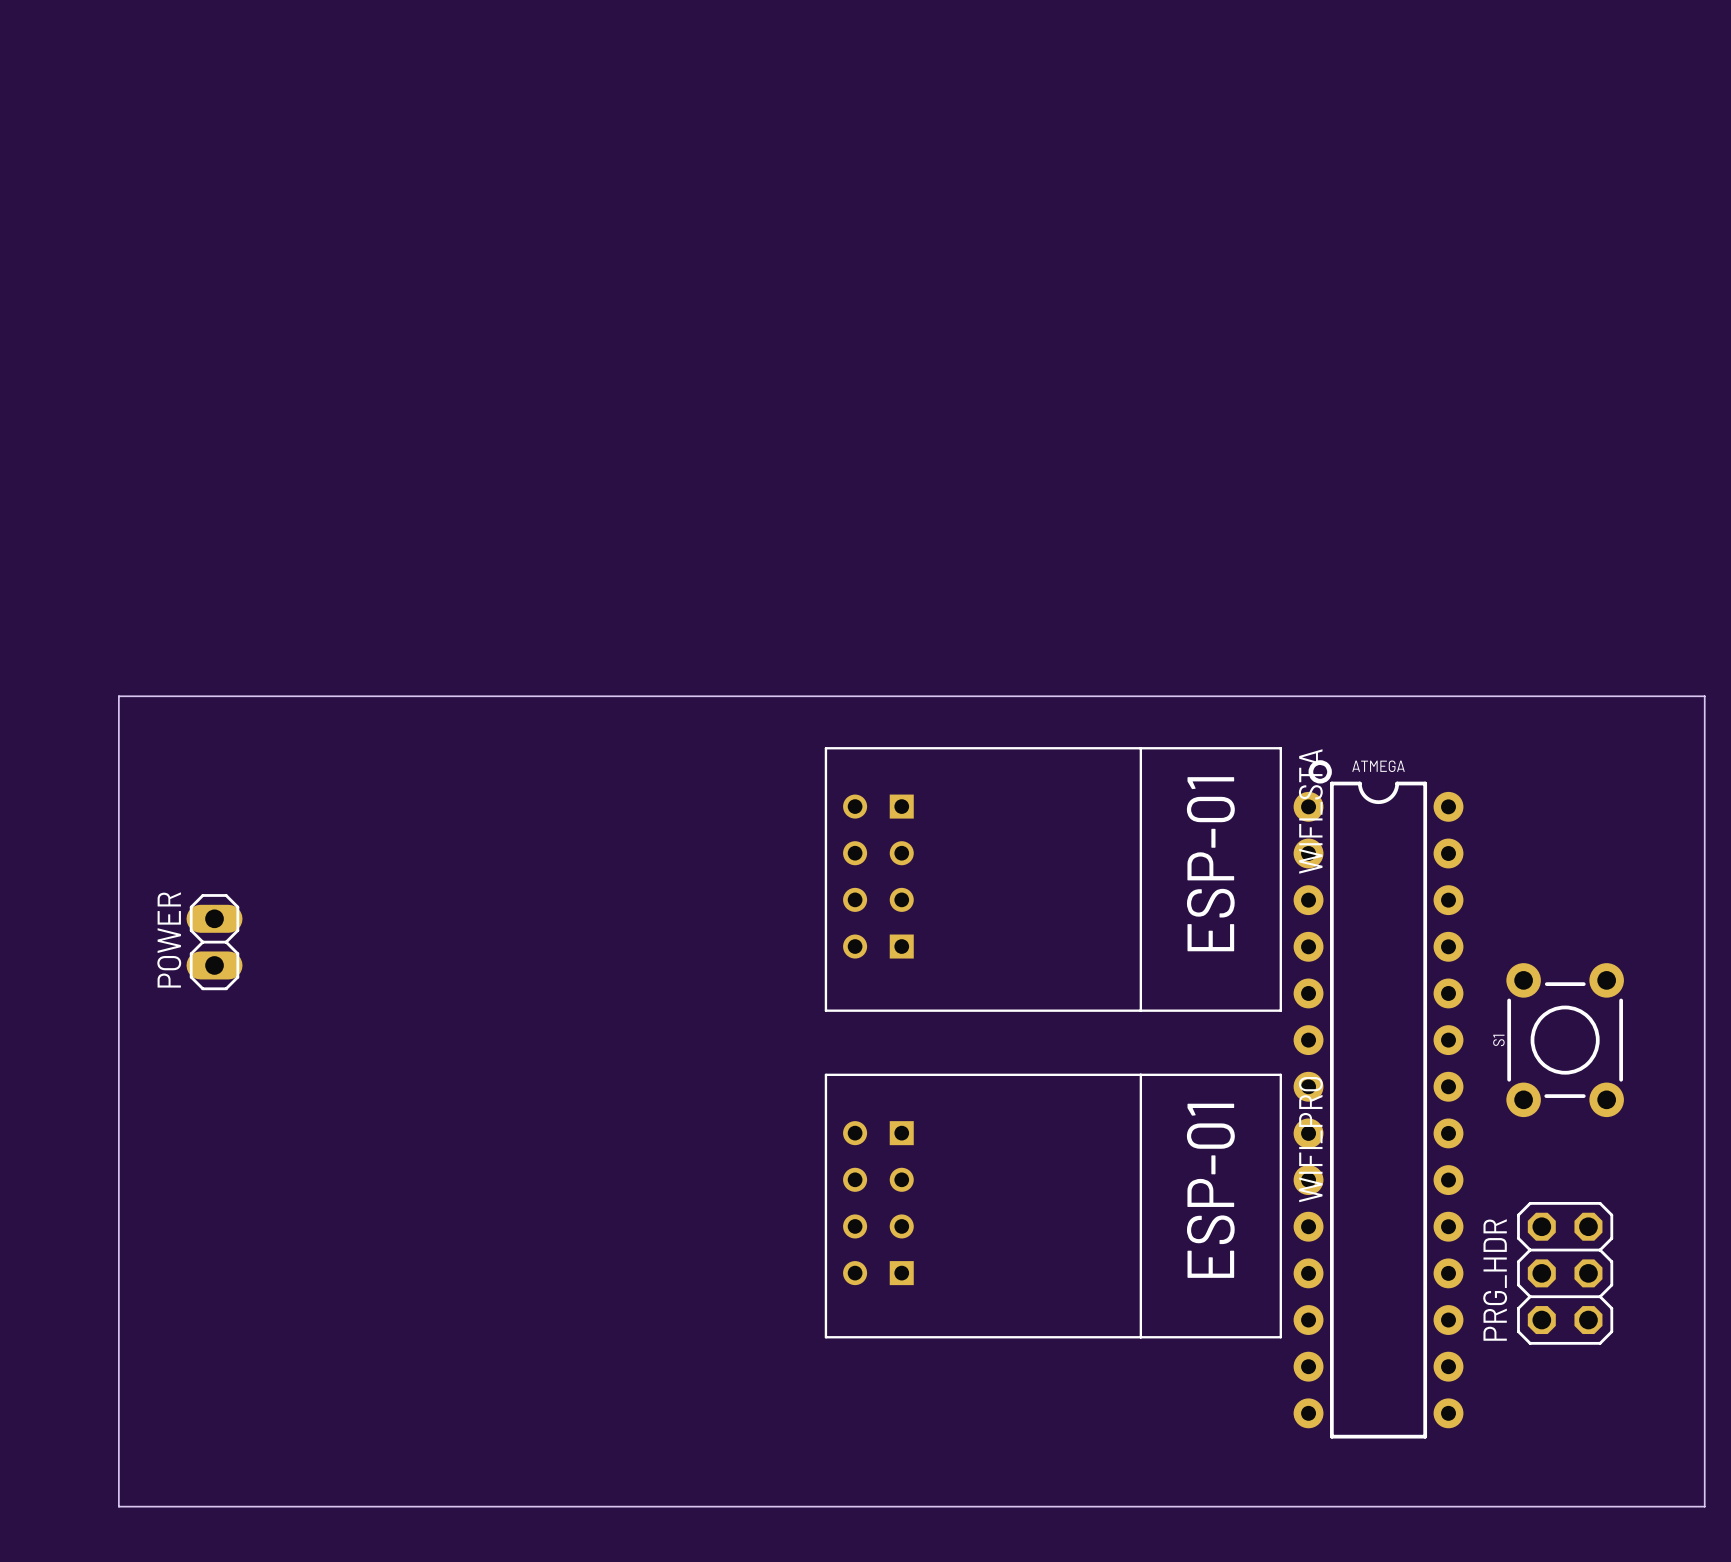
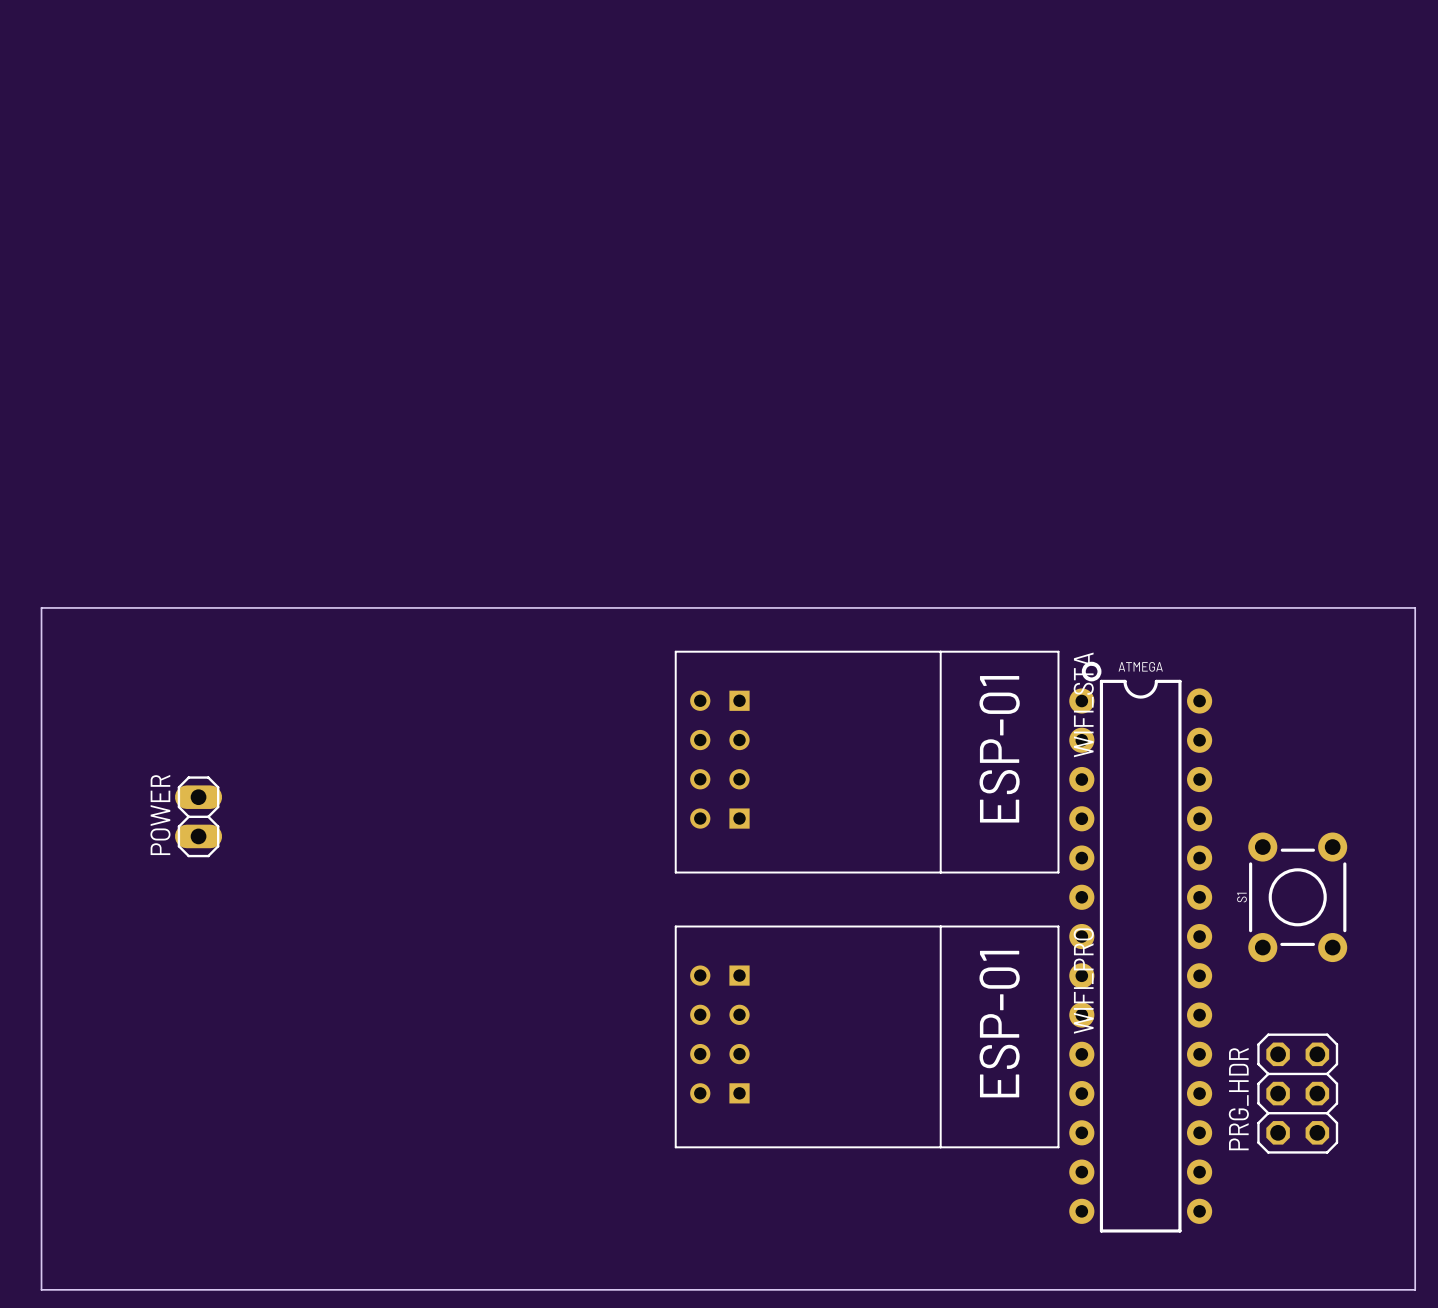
board edge: (118, 696) (118, 1506) -> (80, 607) (41, 607) (41, 1289) (80, 1289)
POWER position: (214, 942) -> (198, 816)

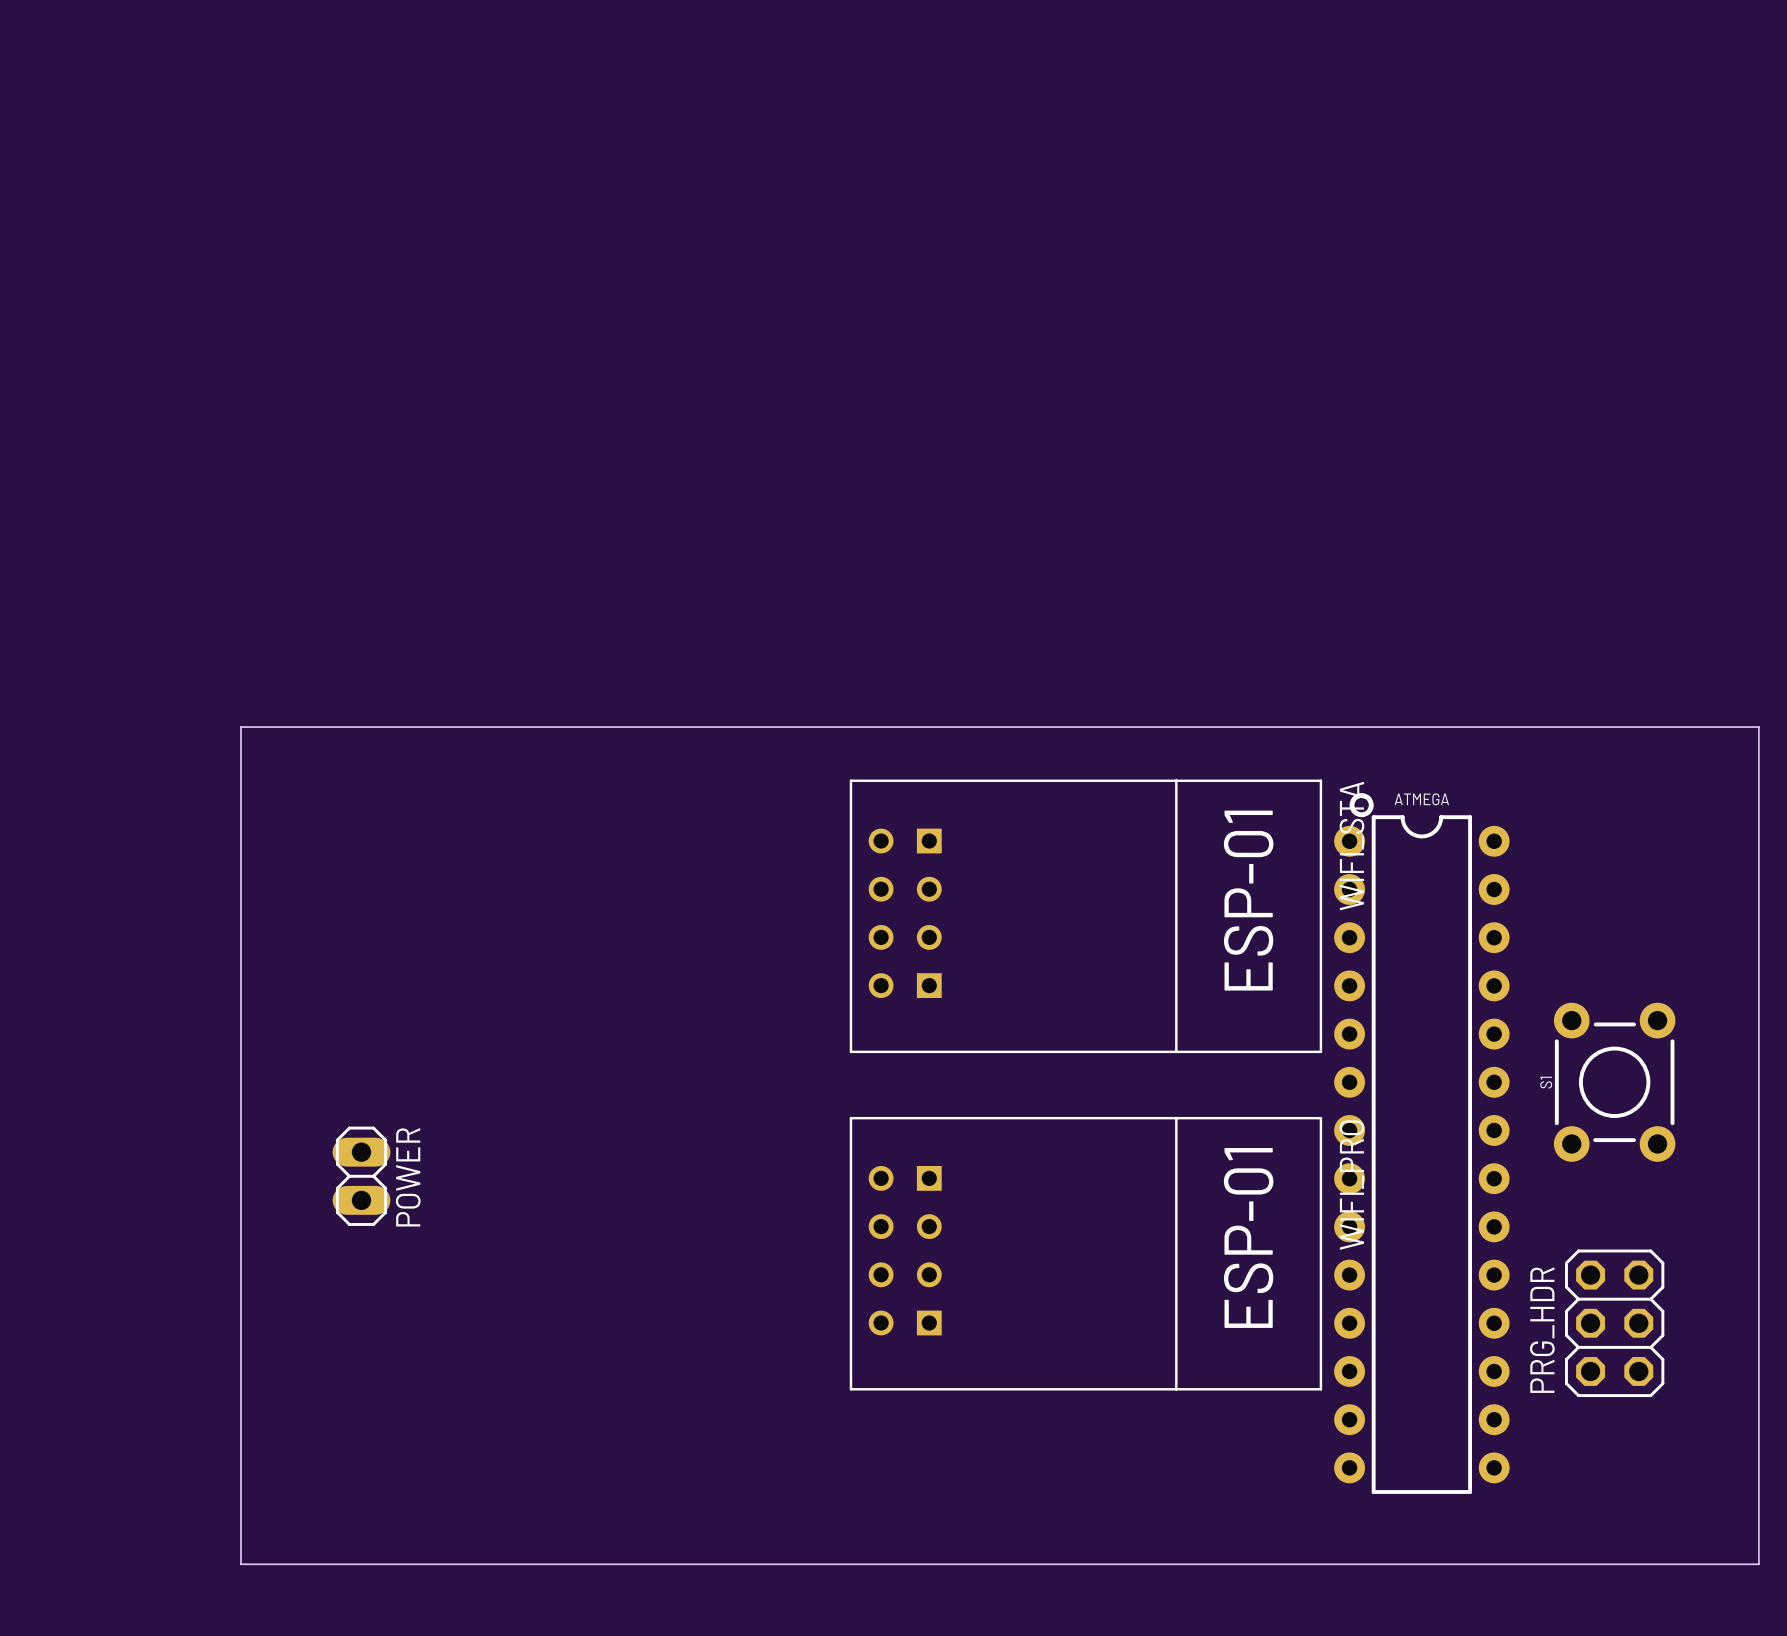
board edge: (178, 607) (41, 607) (41, 1289) (178, 1289) -> (240, 727) (240, 1564)
POWER name position: POWER (160, 815) -> POWER (408, 1177)
POWER position: (198, 816) -> (361, 1176)

